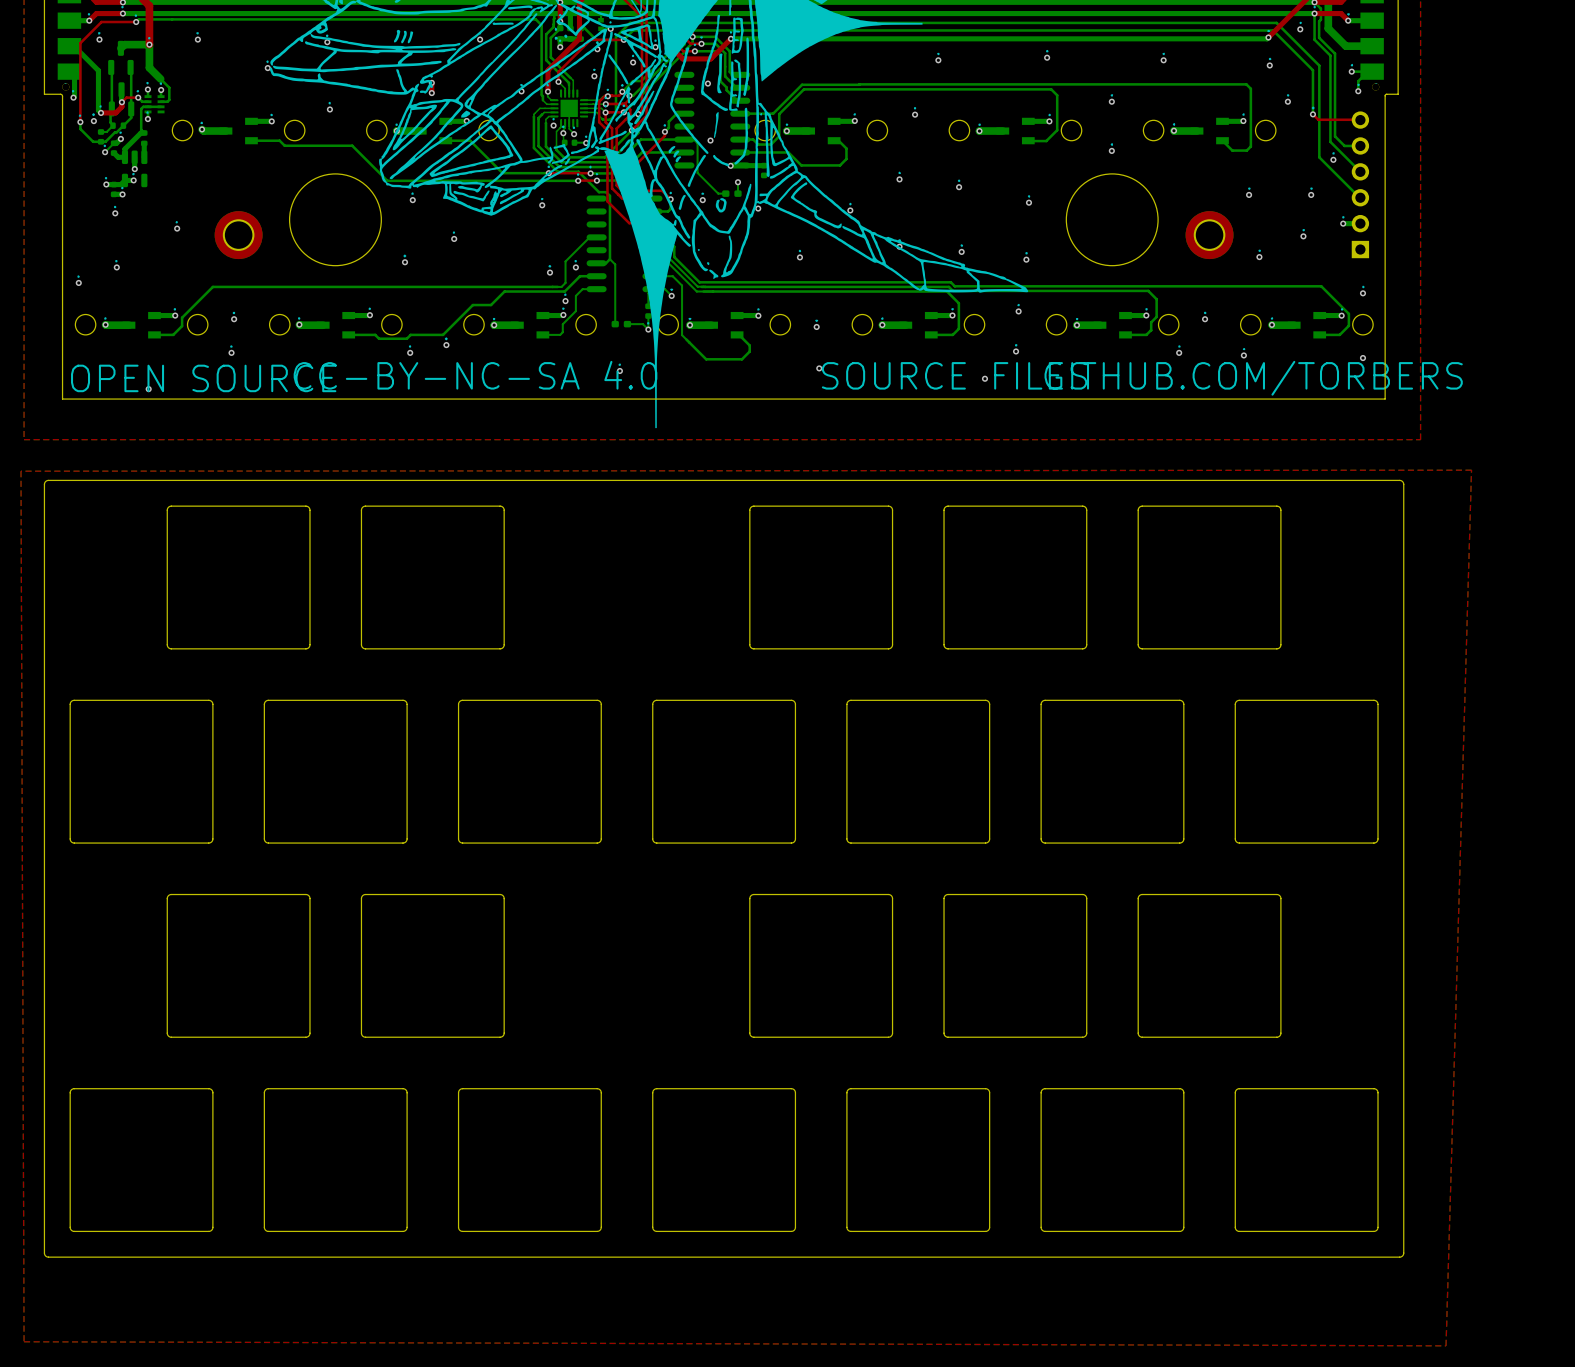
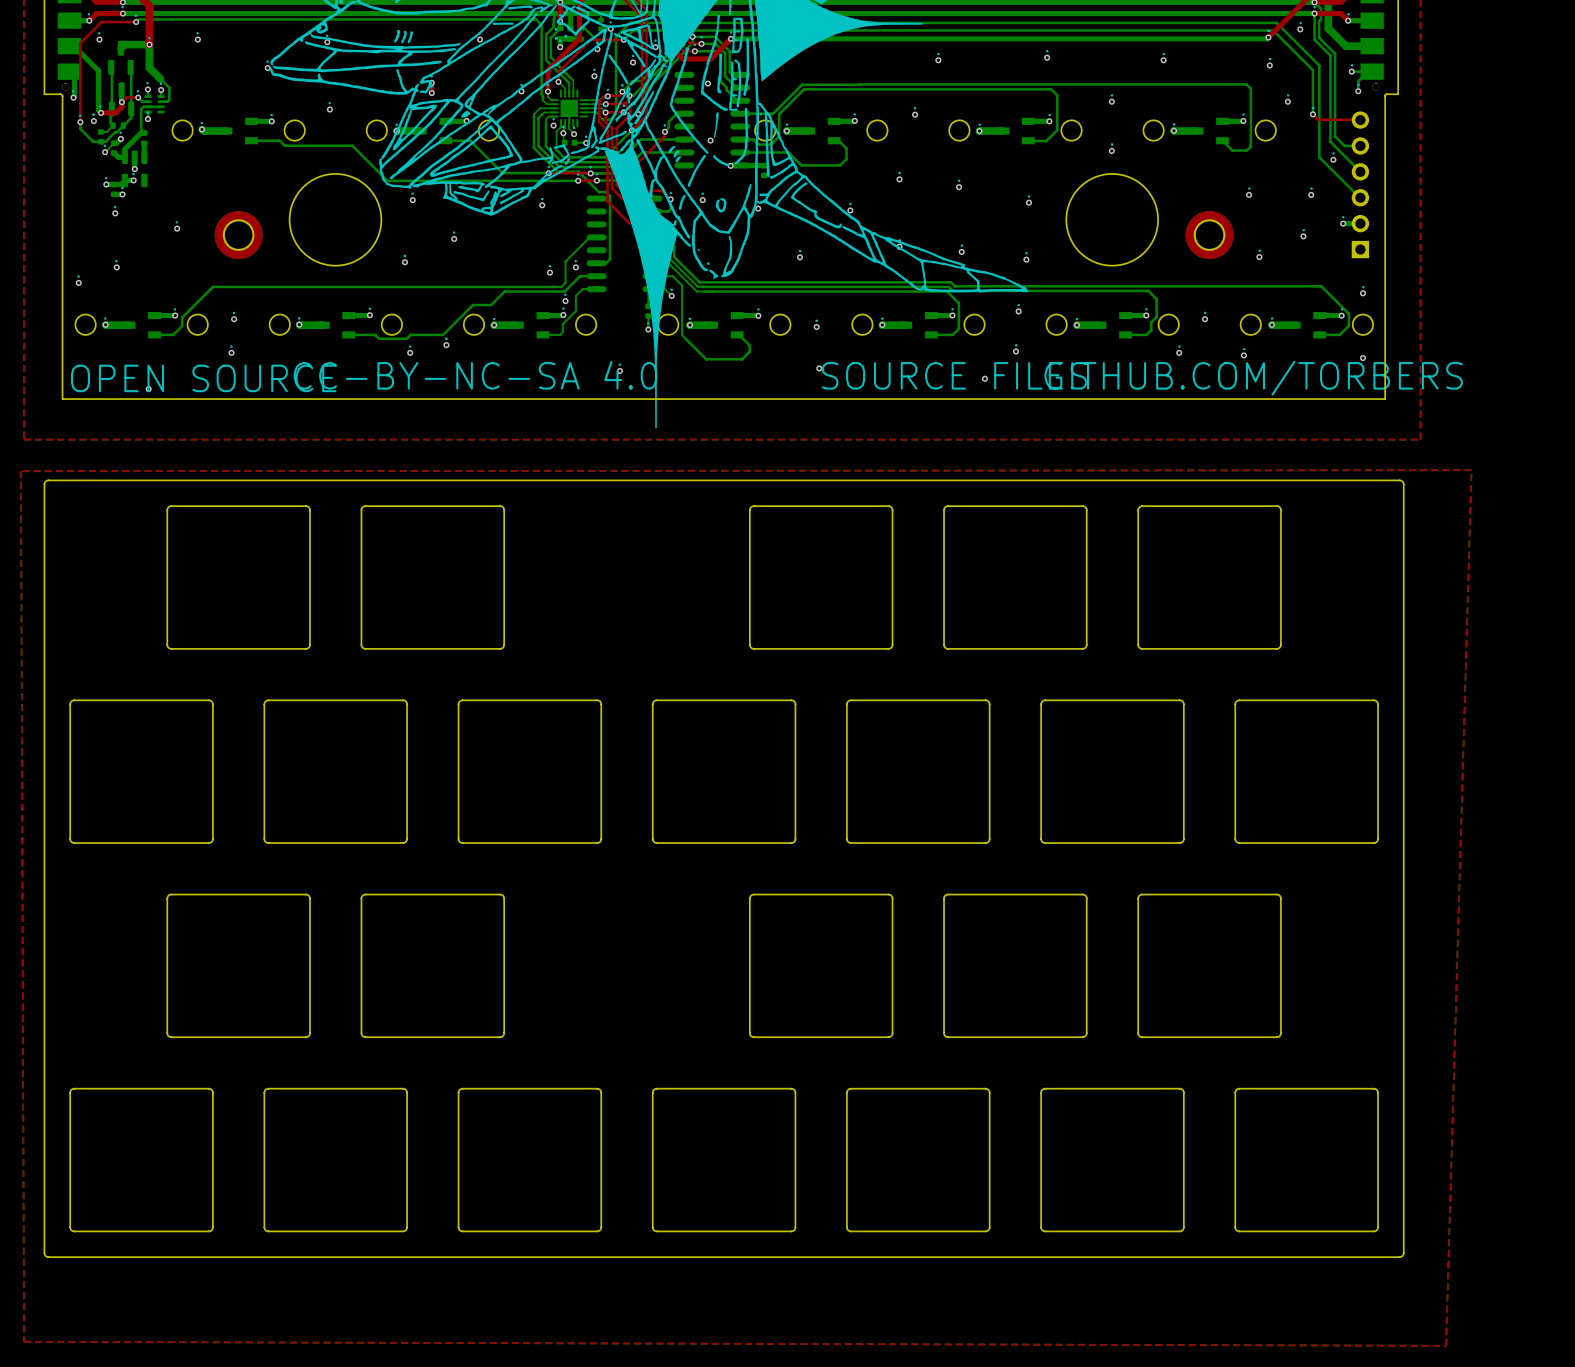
bottom track: (684, 139) (693, 139) (697, 143) (697, 172) (718, 193) (725, 193) -> none
bottom track: (737, 182) (737, 193) -> none
via: (737, 182) -> none
part: (731, 193) -> none
bottom track: (609, 259) (615, 264) (615, 324) -> none
part: (621, 324) -> none
bottom track: (627, 324) (642, 324) (648, 329) -> none

